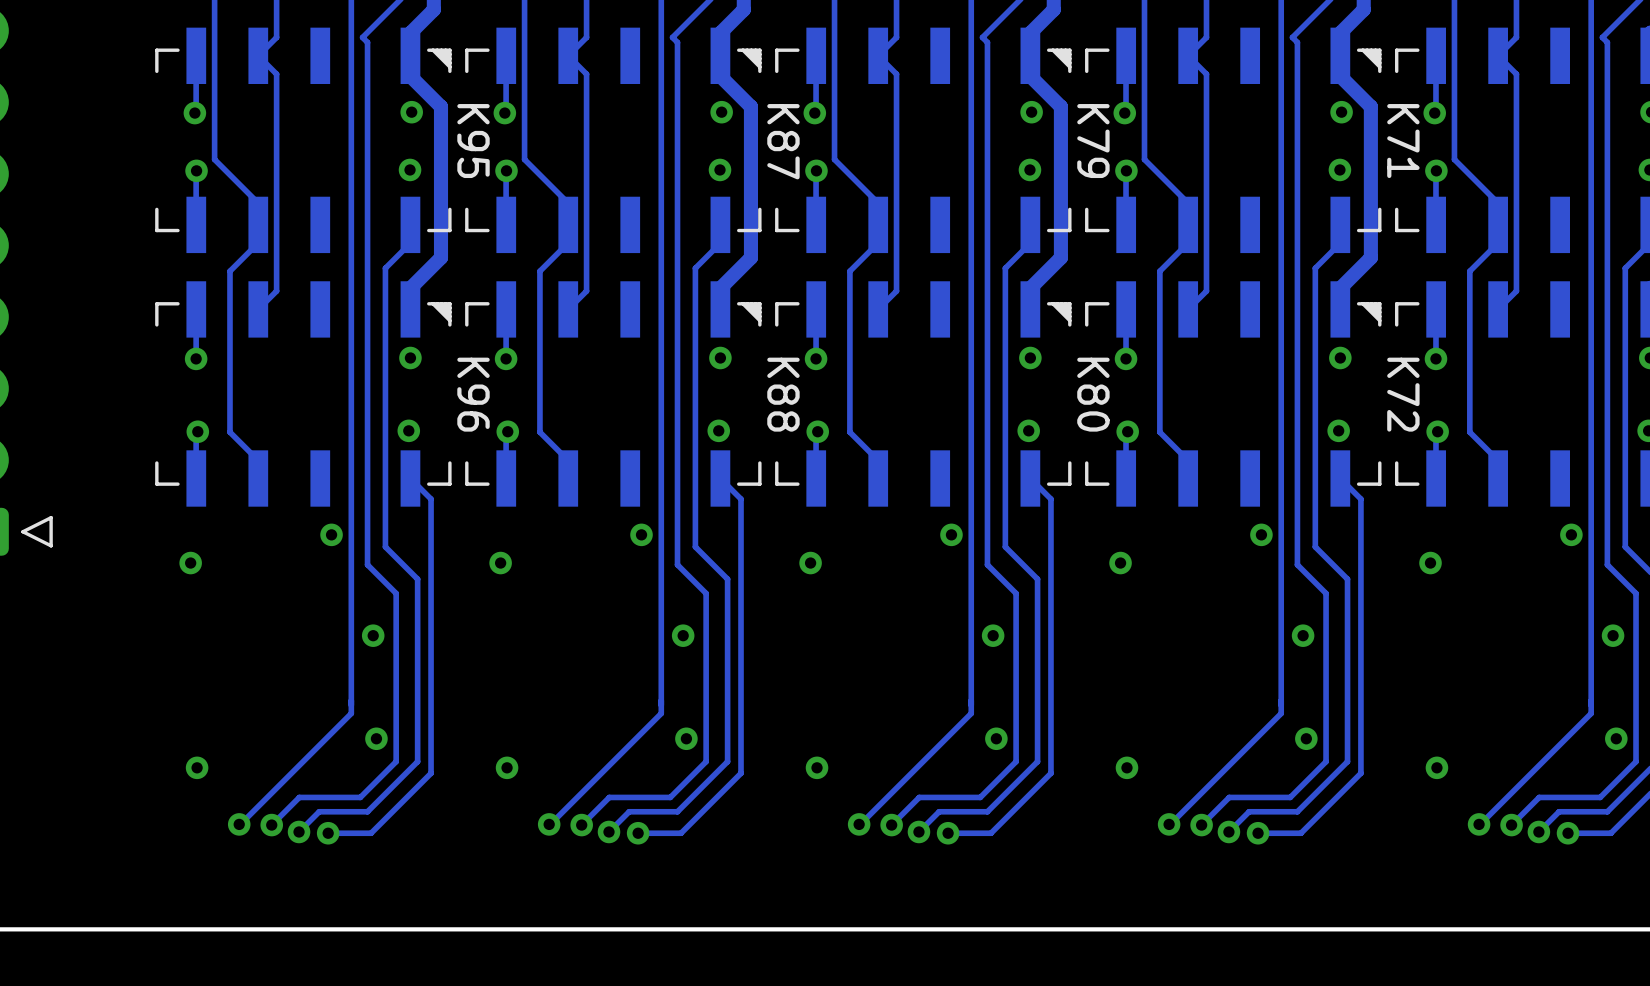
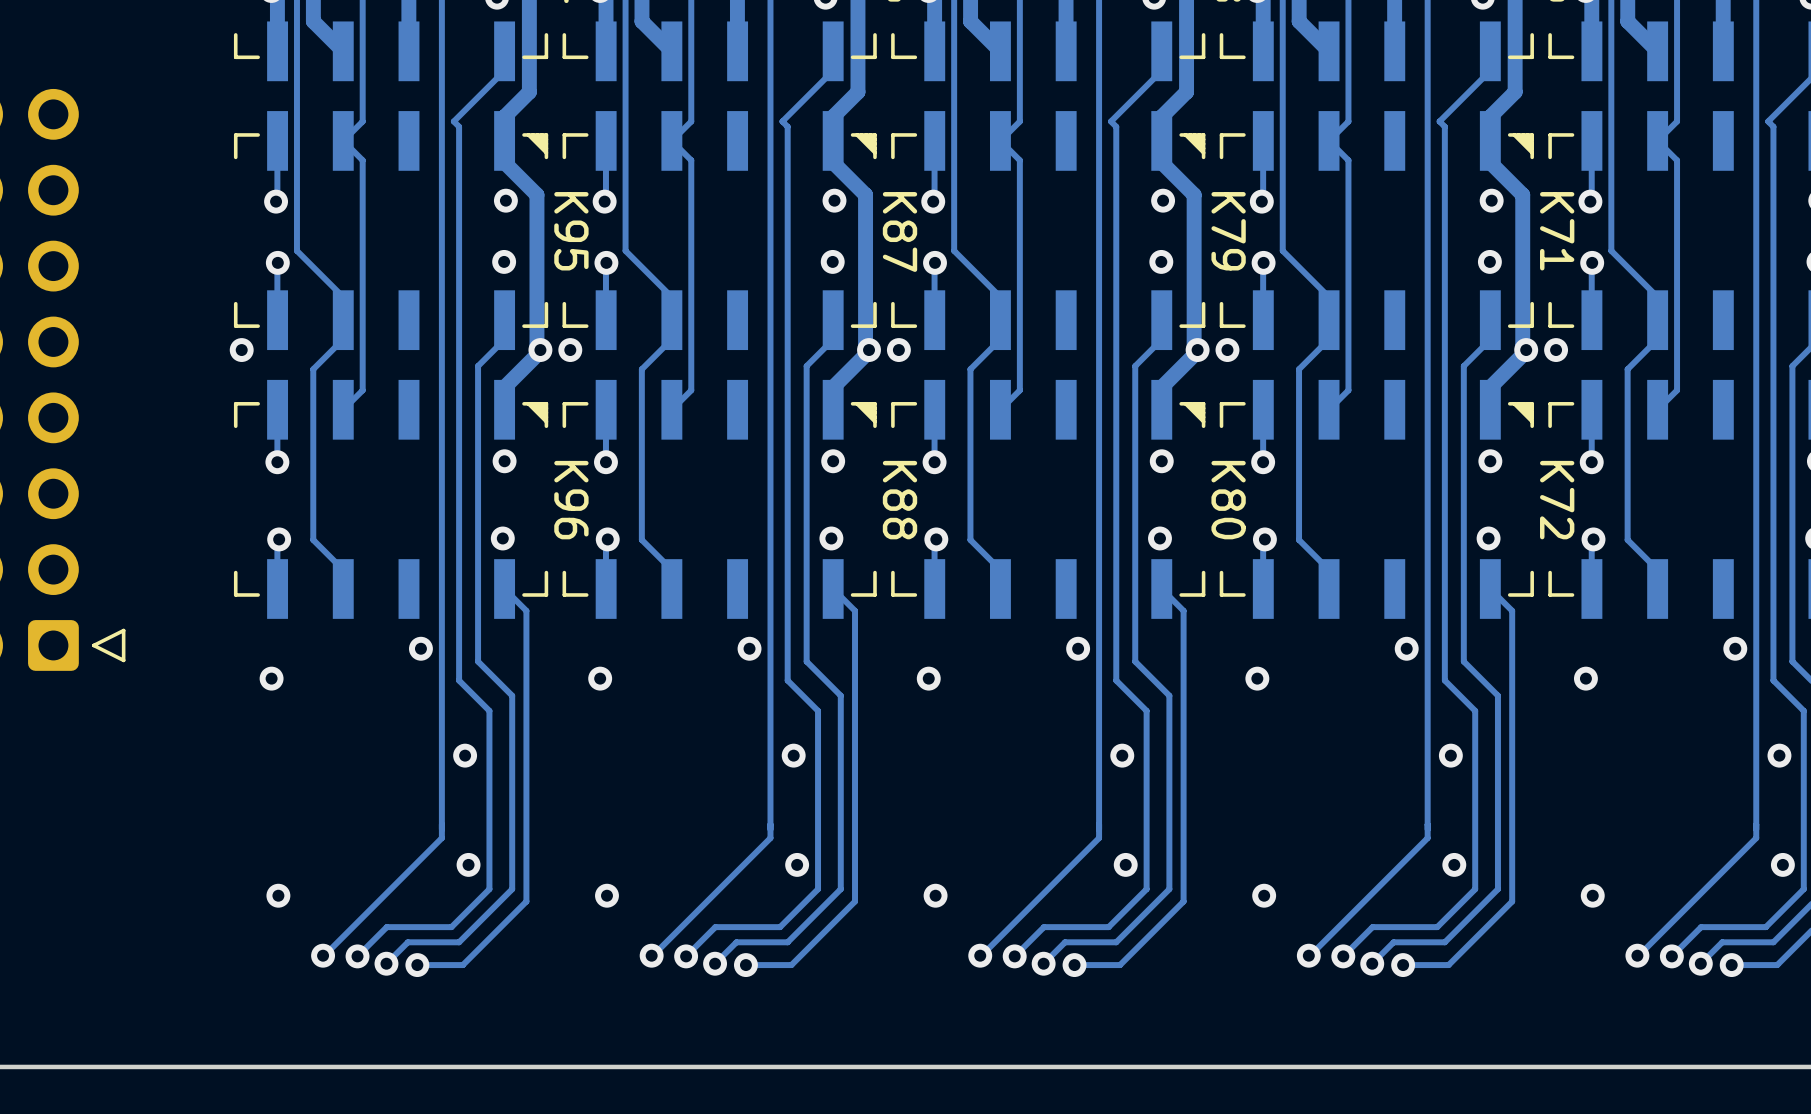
via: none -> (241, 350)
via: none -> (540, 350)
via: none -> (570, 350)
via: none -> (869, 350)
via: none -> (898, 350)
via: none -> (1197, 350)
via: none -> (1227, 350)
via: none -> (1526, 350)
via: none -> (1556, 350)

